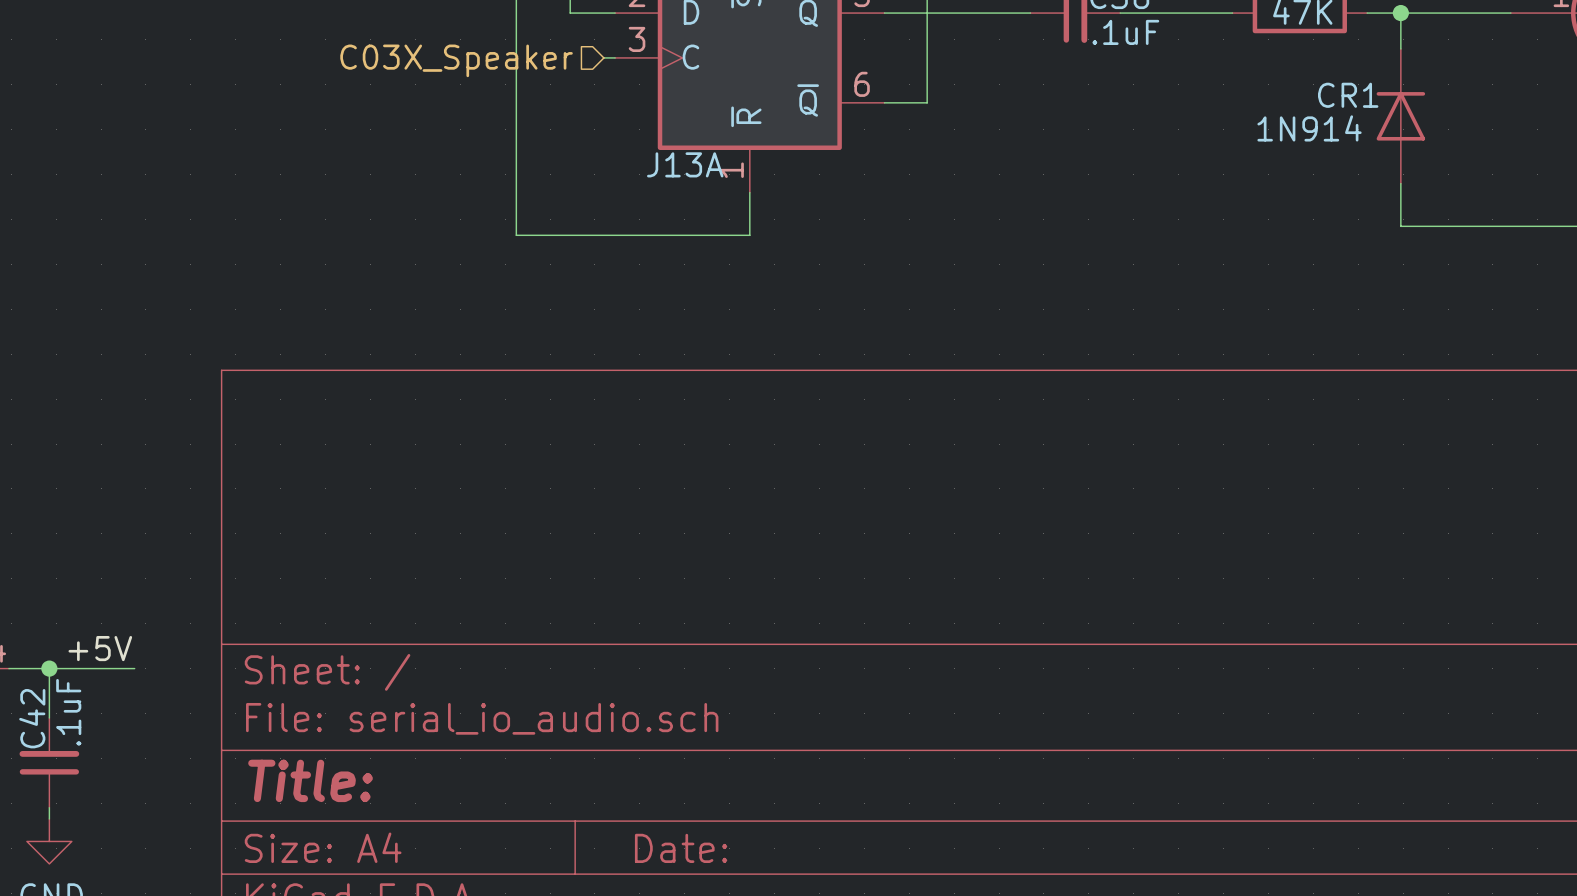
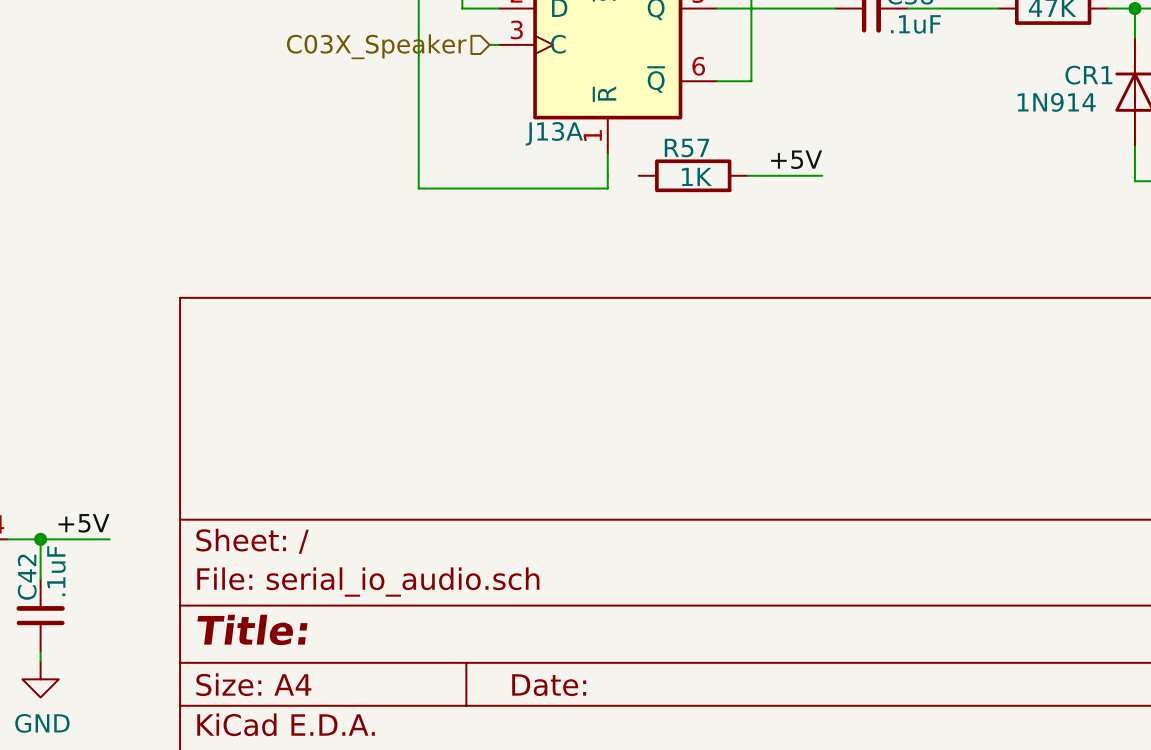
label: none -> +5V (796, 159)
R57: none -> 1K (693, 175)
wire: none -> (747, 175) (822, 175)

